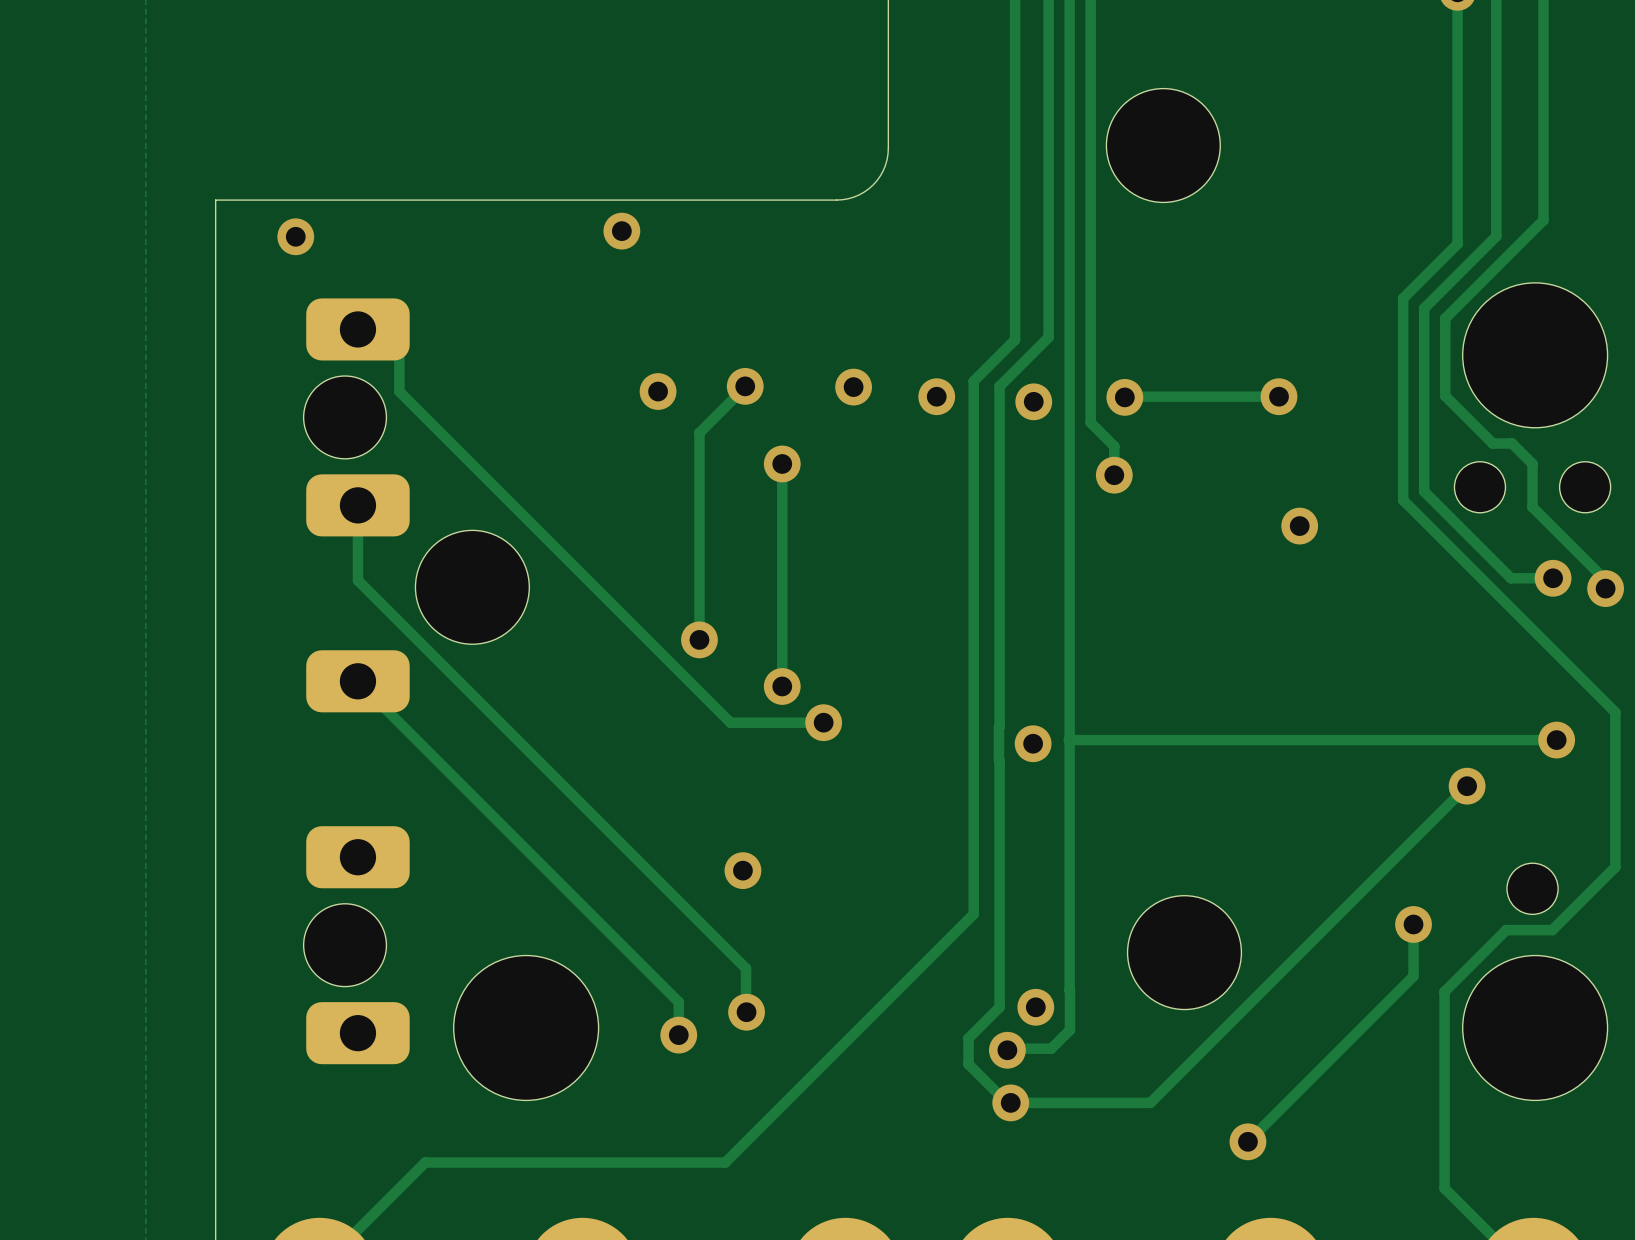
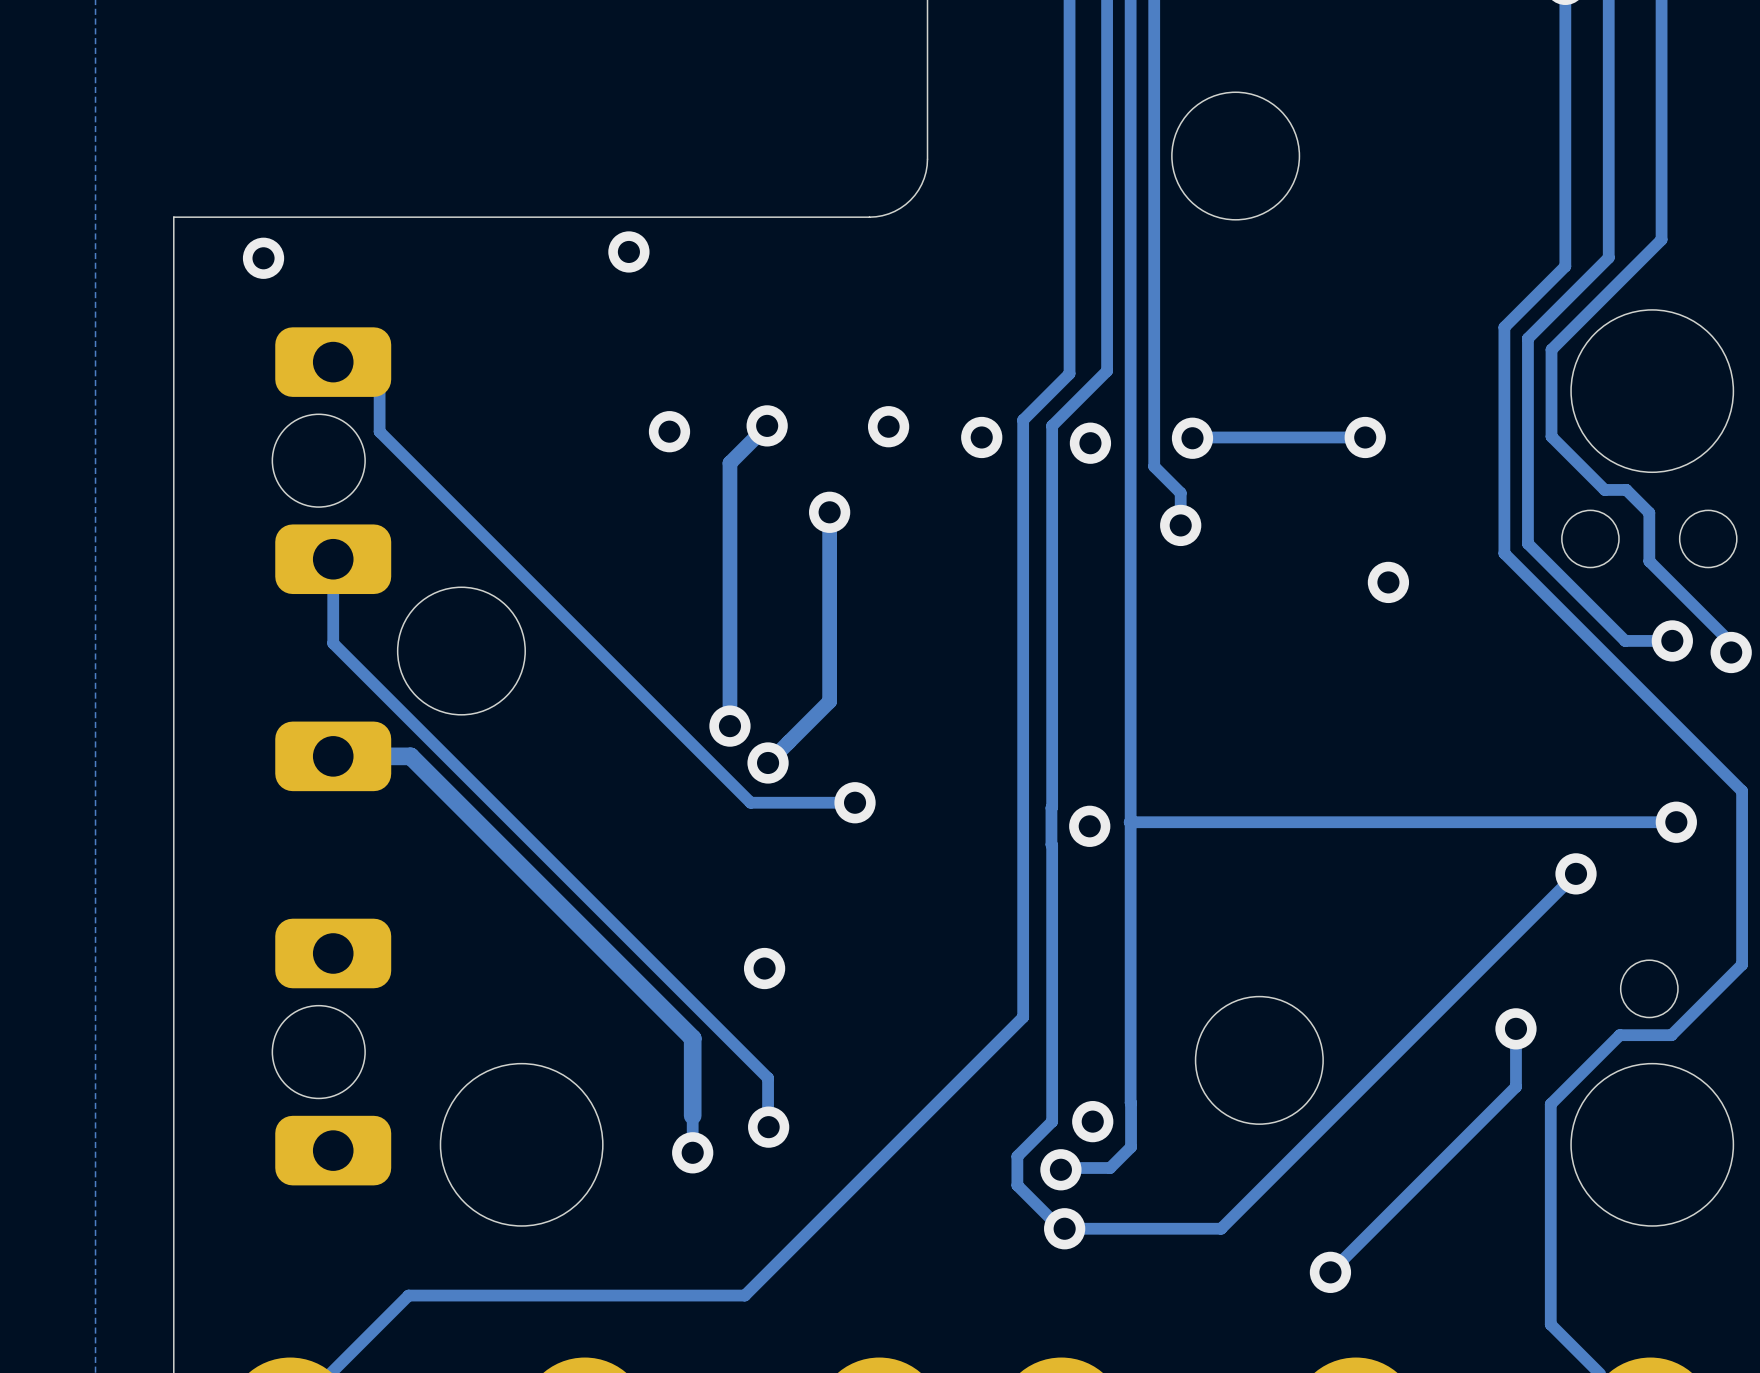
track: (746, 386) (699, 432) (699, 639) -> (767, 425) (729, 463) (729, 726)
track: (782, 463) (782, 686) -> none
via position: (782, 463) -> (829, 512)
track: none -> (829, 512) (829, 701) (768, 762)
via position: (699, 639) -> (729, 726)
track: (357, 681) (678, 1002) -> (333, 756) (410, 756) (692, 1038) (692, 1115)
via position: (782, 686) -> (768, 762)

